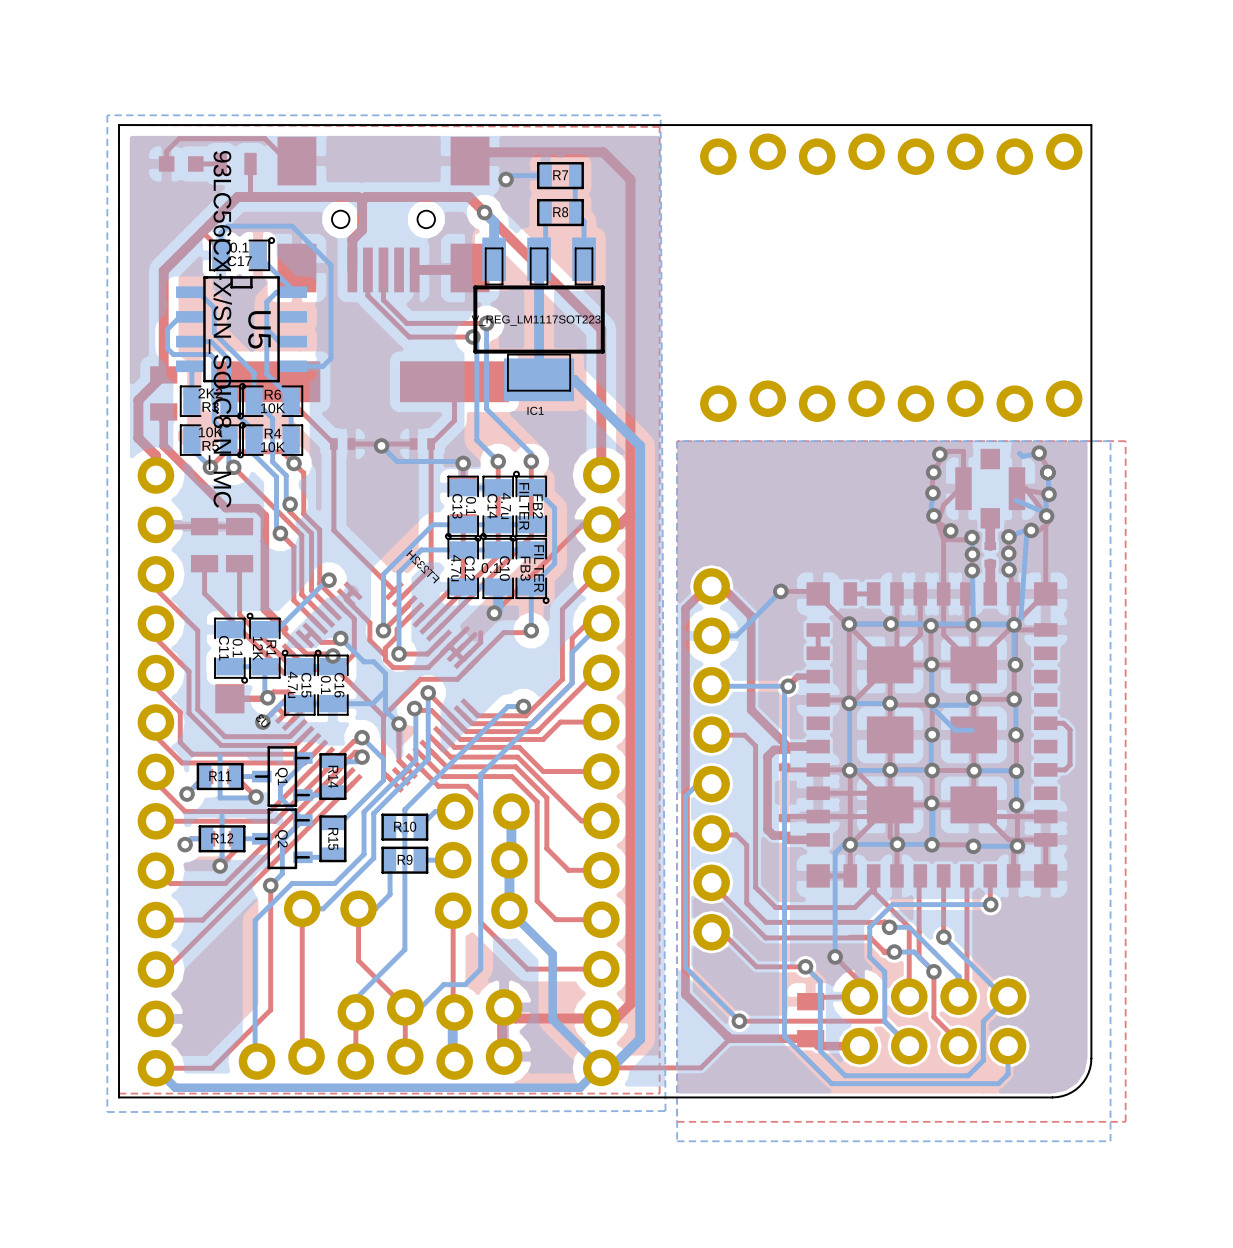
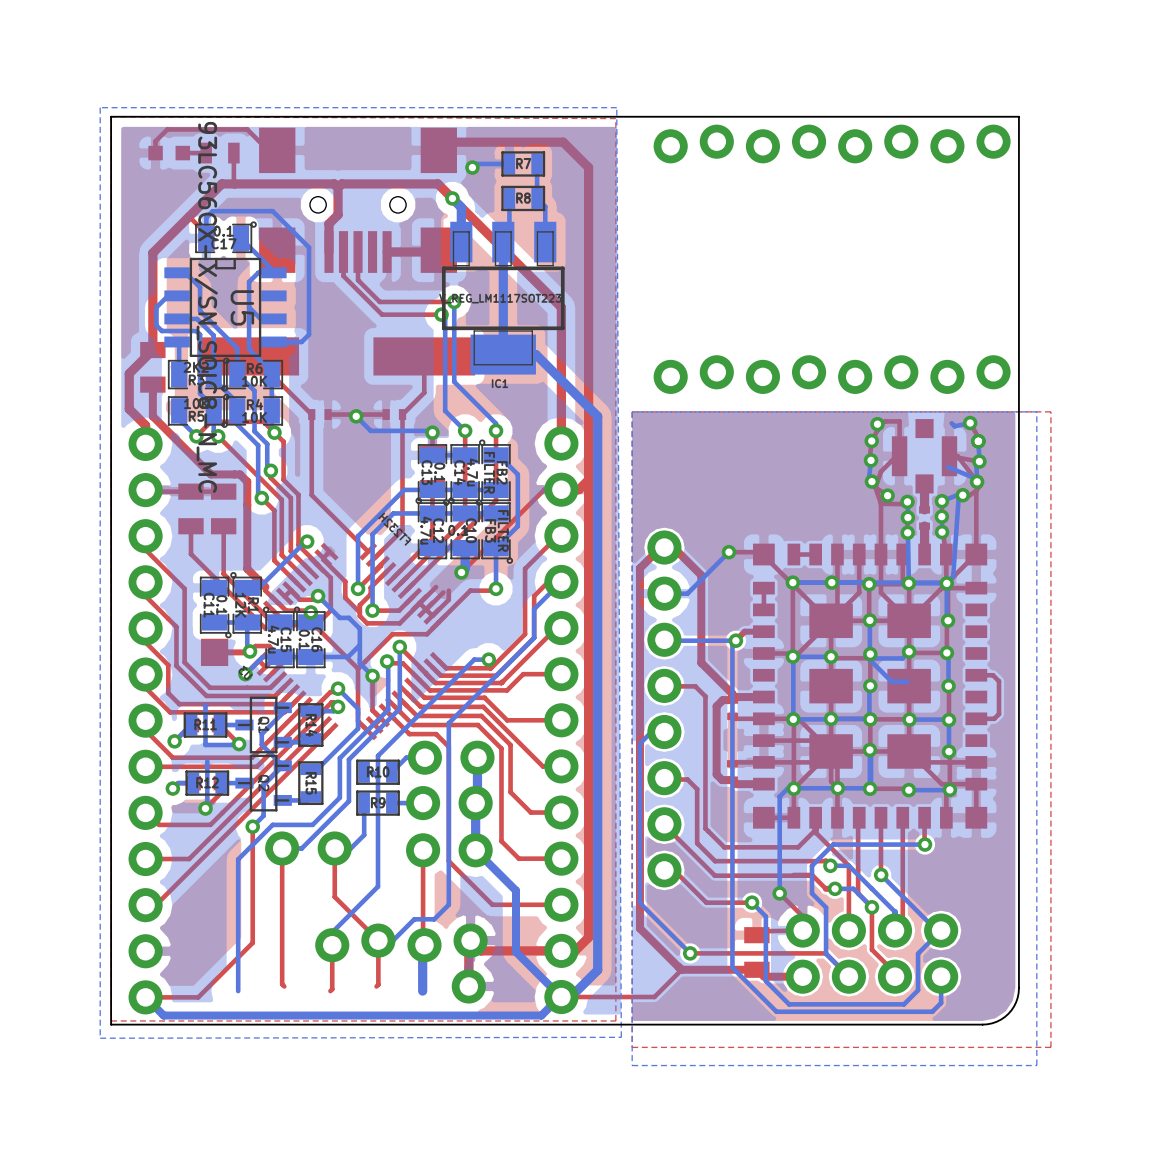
part: none -> (468, 986)
part: (380, 1059) -> none

